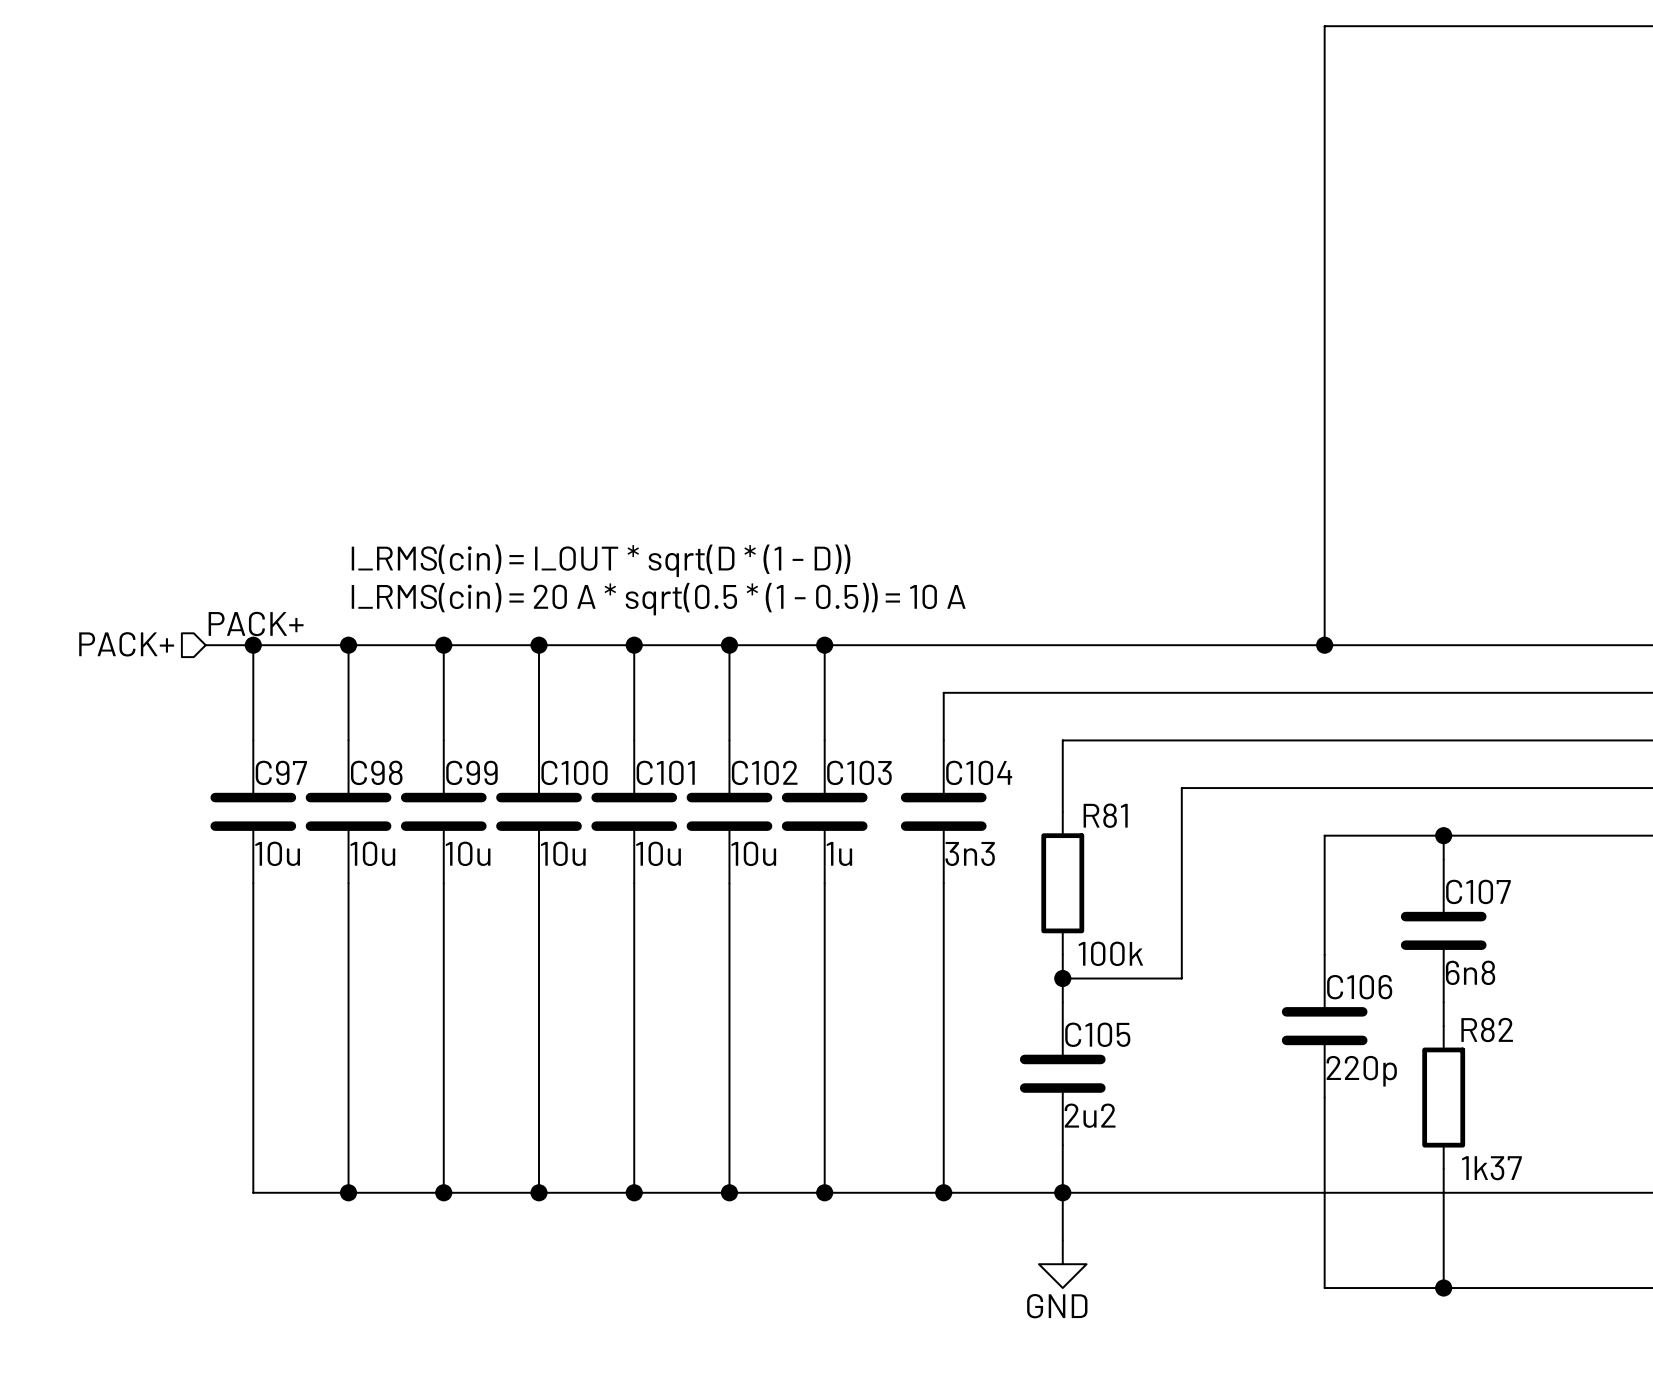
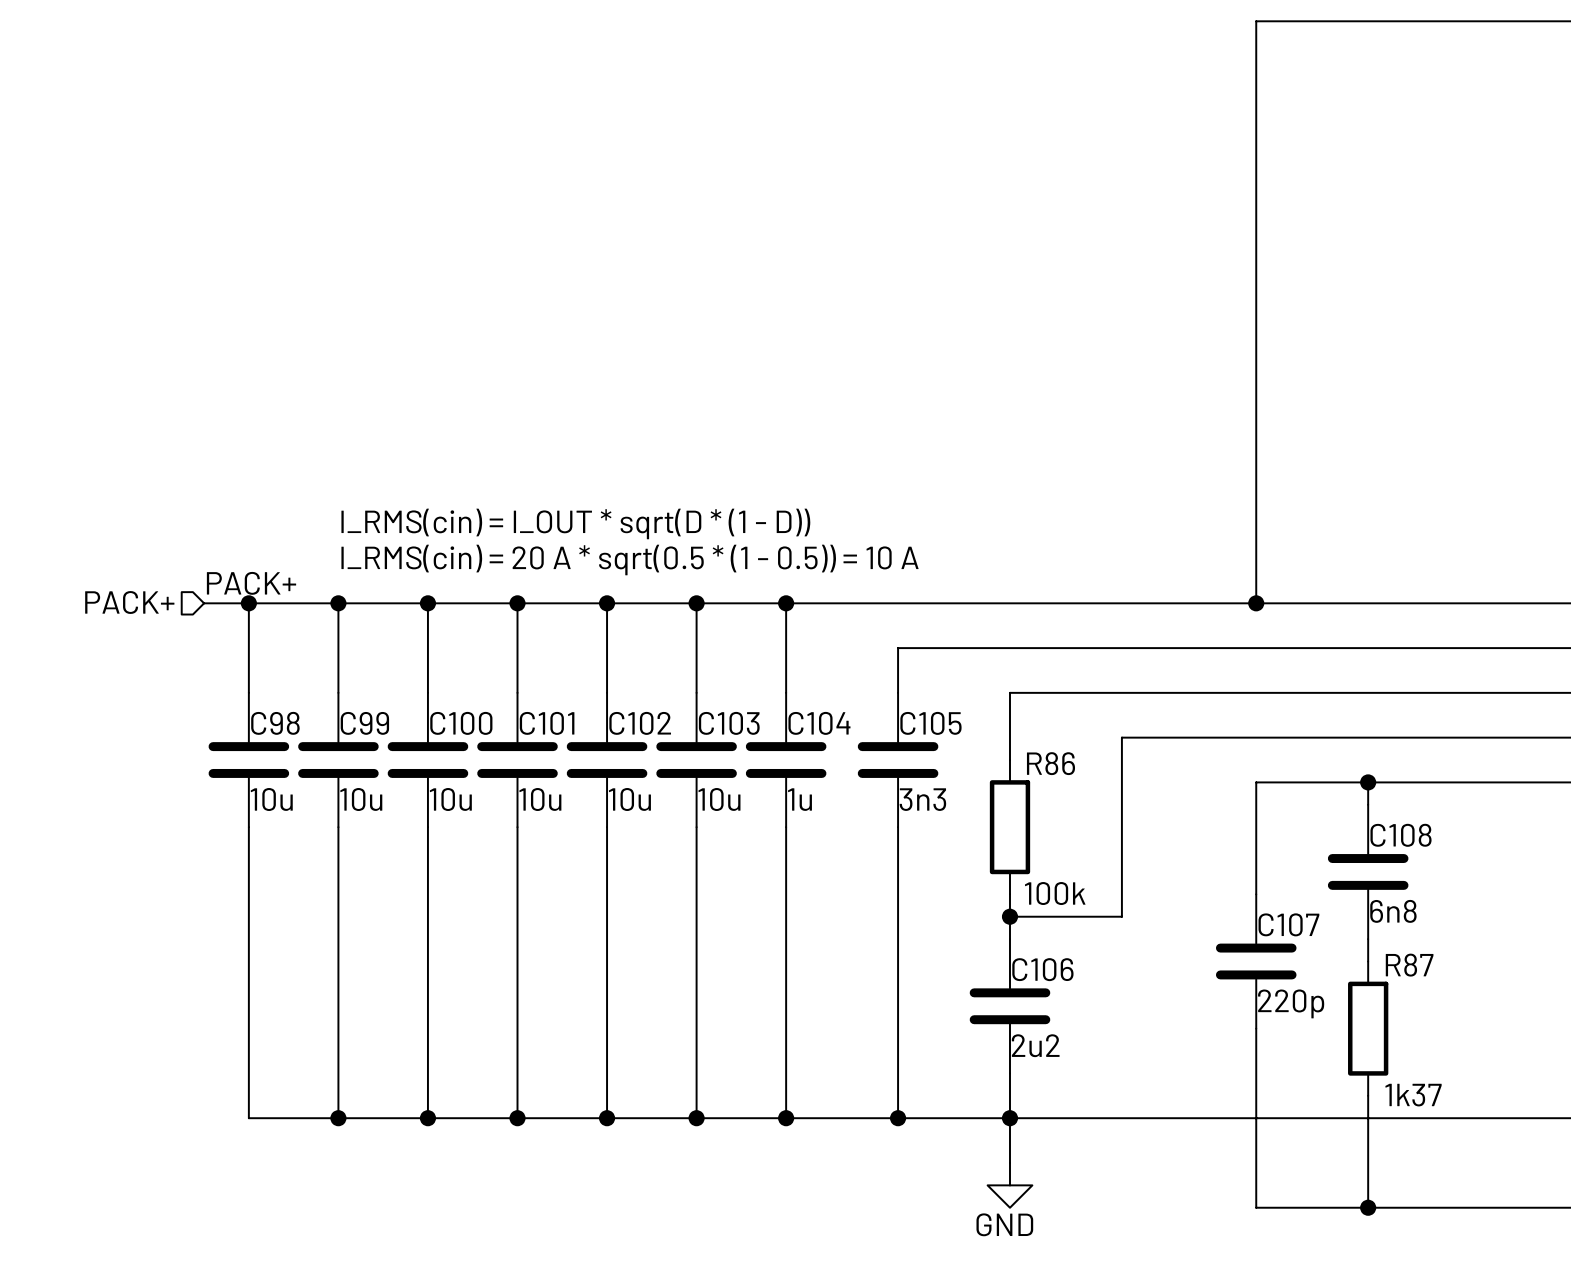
C97 name: C97 (281, 772) -> C98 (275, 723)
C98 name: C98 (376, 772) -> C99 (364, 723)
C99 name: C99 (471, 772) -> C100 (461, 723)
C100 name: C100 (574, 772) -> C101 (547, 723)
C101 name: C101 (665, 772) -> C102 (640, 723)
C102 name: C102 (764, 772) -> C103 (729, 723)
C103 name: C103 (859, 772) -> C104 (819, 723)
C104 name: C104 (979, 772) -> C105 (930, 723)
R81 name: R81 (1105, 815) -> R86 (1050, 763)
C107 name: C107 (1478, 891) -> C108 (1401, 835)
C106 name: C106 (1359, 987) -> C107 (1288, 924)
R82 name: R82 (1487, 1029) -> R87 (1409, 965)
C105 name: C105 (1097, 1034) -> C106 (1042, 969)

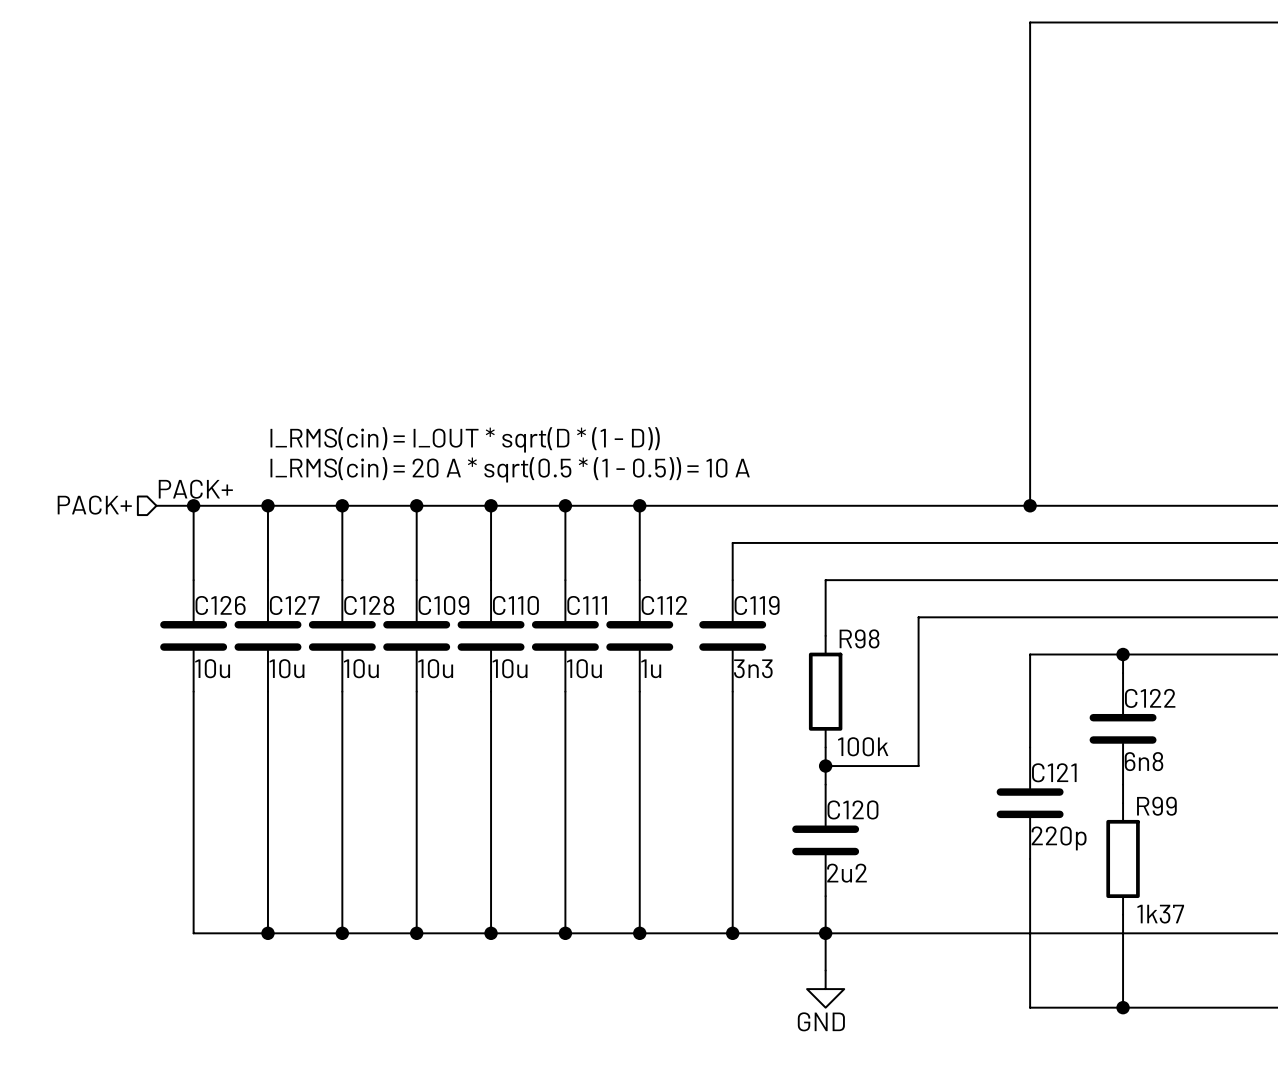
C98 name: C98 (275, 723) -> C126 (220, 605)
C99 name: C99 (364, 723) -> C127 (294, 605)
C100 name: C100 (461, 723) -> C128 (369, 605)
C101 name: C101 (547, 723) -> C109 (443, 605)
C102 name: C102 (640, 723) -> C110 (515, 605)
C103 name: C103 (729, 723) -> C111 (587, 605)
C104 name: C104 (819, 723) -> C112 (664, 605)
C105 name: C105 (930, 723) -> C119 (757, 605)
R86 name: R86 (1050, 763) -> R98 (859, 638)
C108 name: C108 (1401, 835) -> C122 (1150, 698)
C107 name: C107 (1288, 924) -> C121 (1054, 772)
R87 name: R87 (1409, 965) -> R99 (1156, 806)
C106 name: C106 (1042, 969) -> C120 (852, 809)

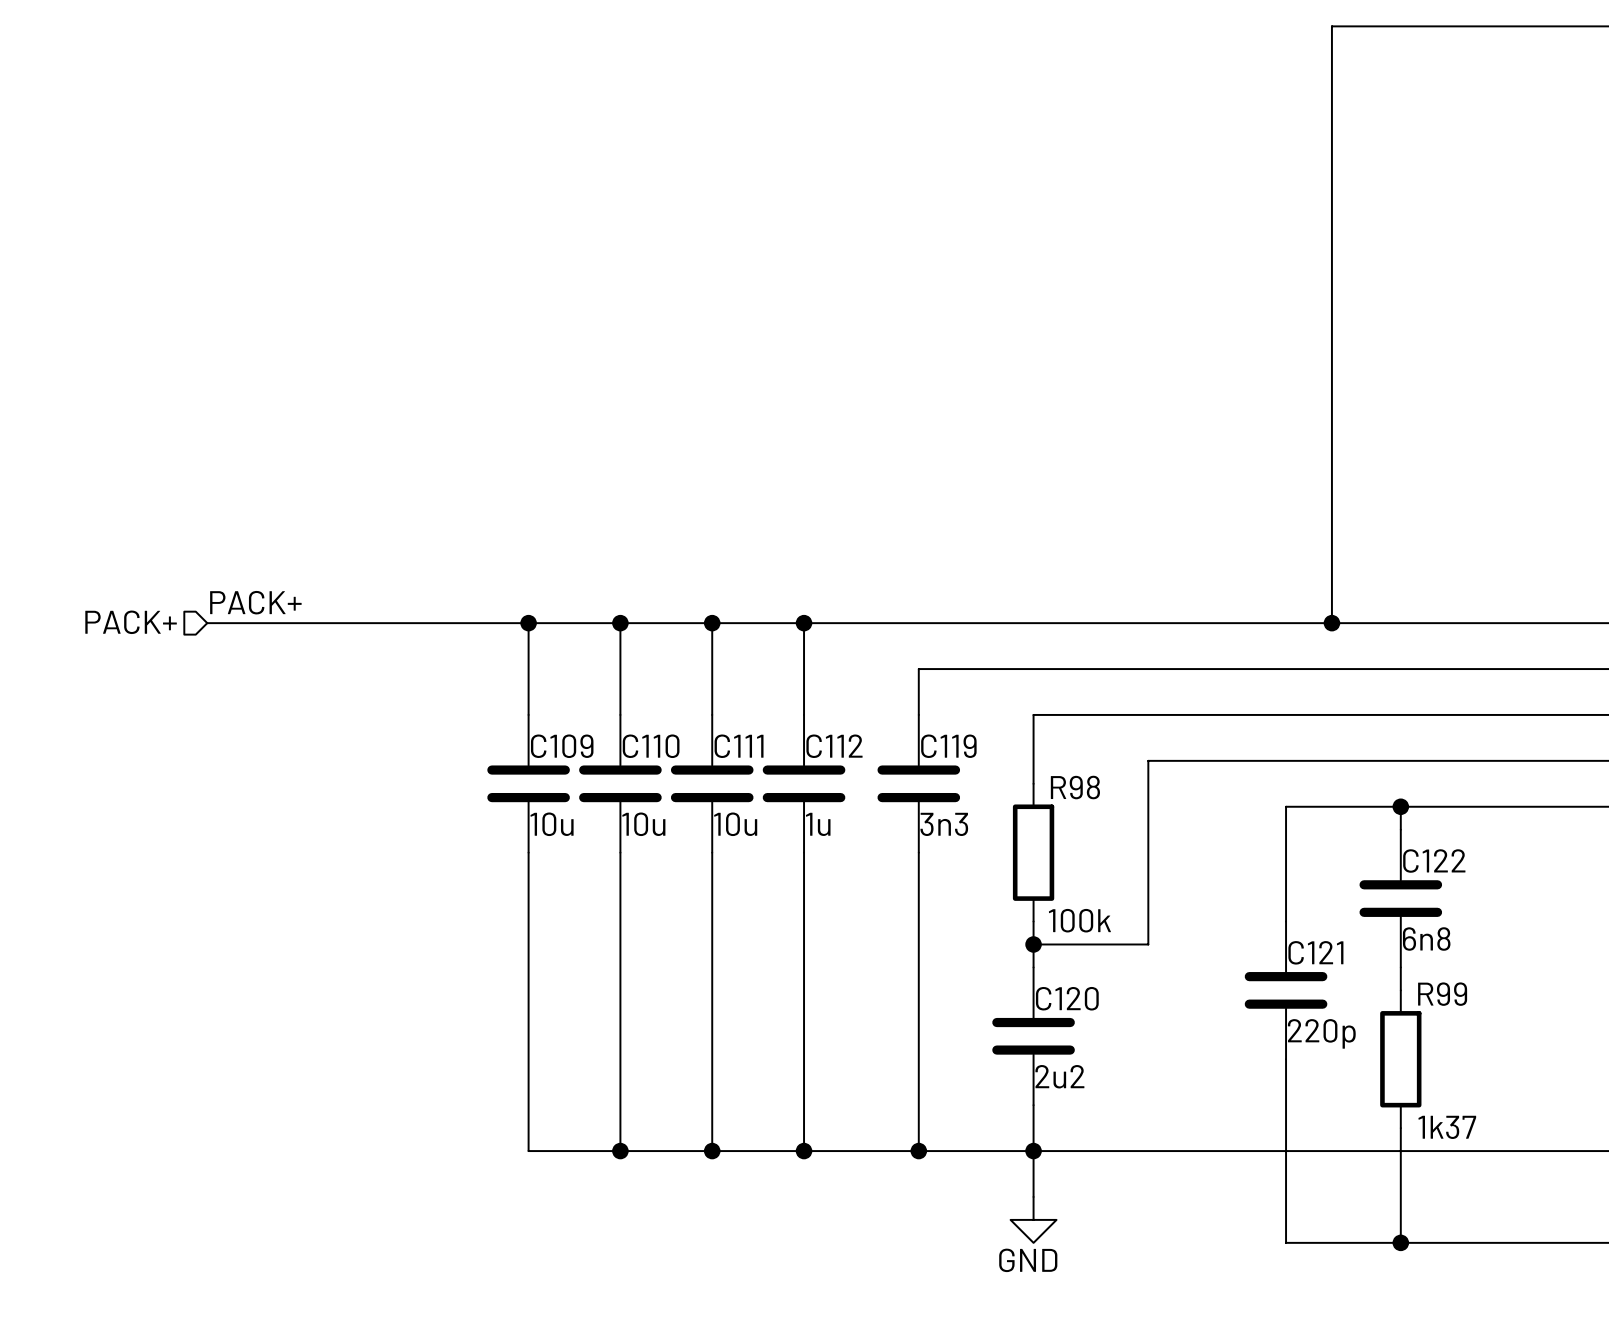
wire: (1067, 22) (1030, 22) (1030, 505) -> (1331, 26) (1331, 623)
text: I_RMS(cin) = I_OUT * sqrt(D * (1 - D)) (465, 439) -> none
text: I_RMS(cin) = 20 A * sqrt(0.5 * (1 - 0.5)) = 10 A (510, 469) -> none
wire: (193, 505) (193, 580) -> none
junction: (193, 505) -> none
wire: (267, 505) (267, 580) -> none
junction: (267, 505) -> none
wire: (342, 505) (342, 580) -> none
junction: (342, 505) -> none
junction position: (1030, 505) -> (1331, 623)
C126: 10u (193, 635) -> none
C127: 10u (267, 635) -> none
C128: 10u (342, 635) -> none
wire: (193, 691) (193, 933) (416, 933) -> none
wire: (267, 691) (267, 933) -> none
wire: (342, 691) (342, 933) -> none
junction: (267, 933) -> none
junction: (342, 933) -> none
junction: (416, 933) -> none

